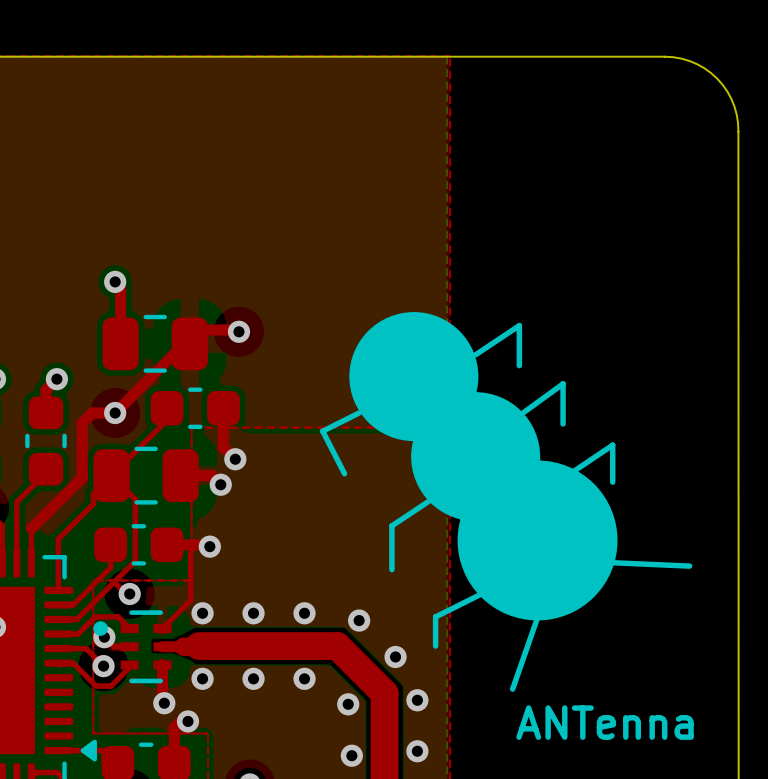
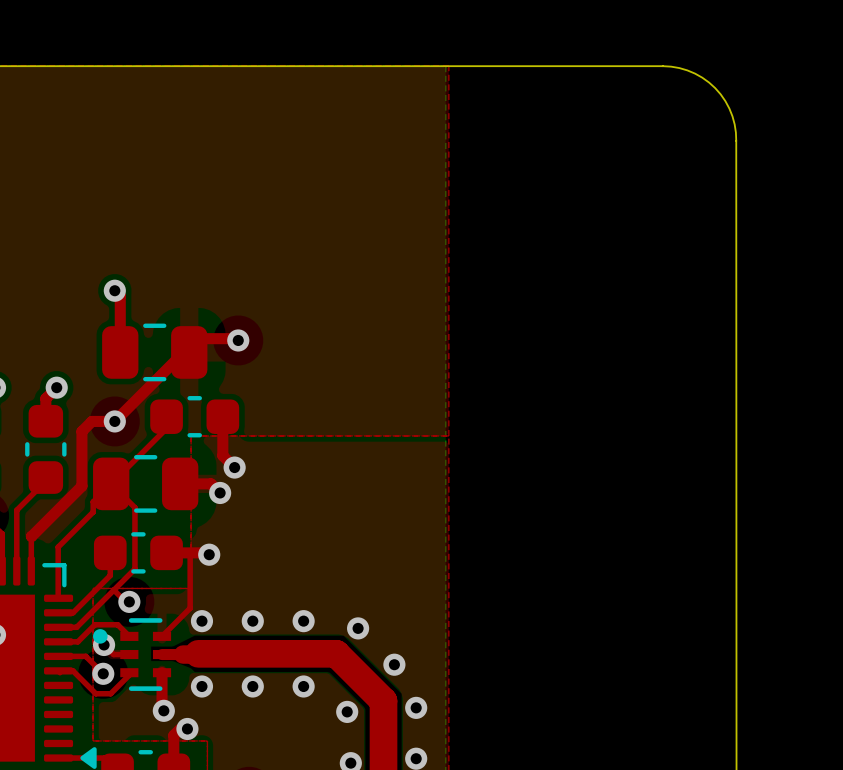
drawing: [349, 312, 618, 621] -> none
line: (475, 354) (519, 325) (519, 365) -> none
line: (359, 413) (322, 431) (344, 473) -> none
line: (523, 413) (563, 383) (563, 423) -> none
line: (563, 478) (612, 445) (612, 482) -> none
line: (435, 496) (391, 525) (391, 569) -> none
line: (603, 562) (689, 566) -> none
line: (479, 595) (435, 616) (435, 646) -> none
line: (537, 617) (512, 689) -> none
text: ANTenna (605, 722) -> none

